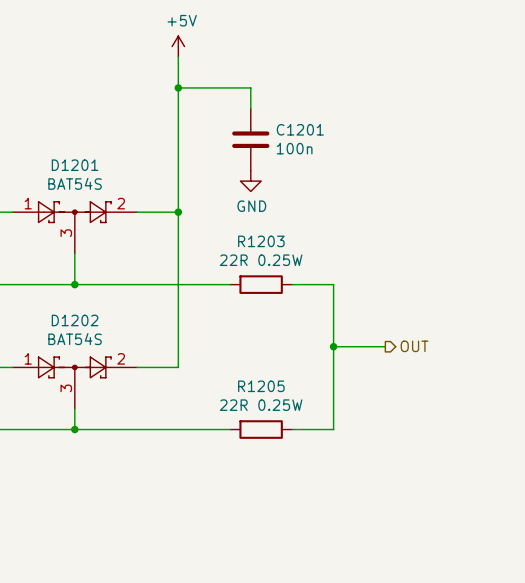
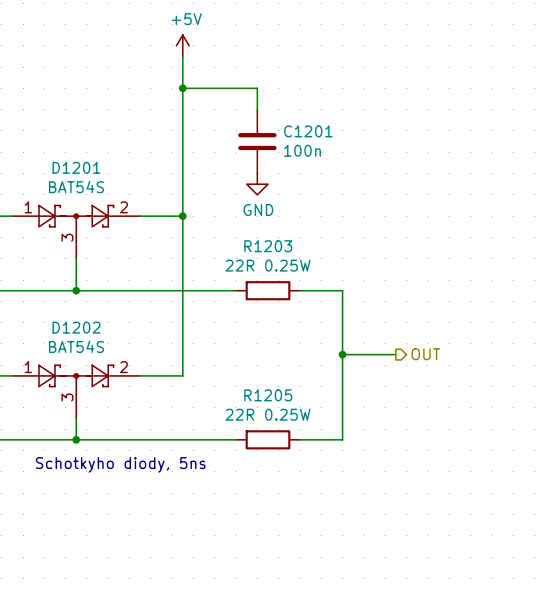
text: none -> Schotkyho diody, 5ns (120, 464)

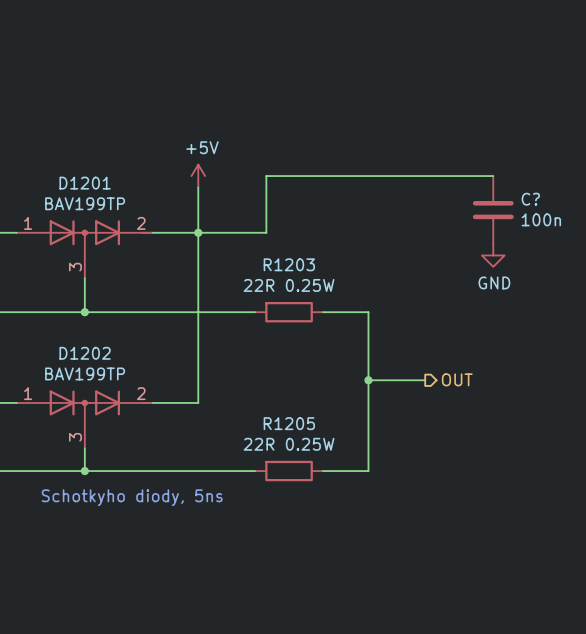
power symbol position: +5V (182, 45) -> +5V (198, 176)
wire: (182, 56) (182, 173) -> none
wire: (182, 88) (257, 88) (257, 109) -> none
junction: (182, 88) -> none
C1201: 100n (257, 141) -> none
wire: none -> (493, 176) (266, 176) (266, 232) (198, 232)
power symbol position: GND (257, 184) -> GND (493, 255)
D1201 value: BAT54S (76, 186) -> BAV199TP (85, 203)
C?: none -> 100n (493, 210)
D1201 symbol: [12, 205, 141, 259] -> [16, 220, 153, 279]
D1202 value: BAT54S (76, 346) -> BAV199TP (85, 373)
D1202 symbol: [12, 365, 141, 419] -> [16, 390, 153, 449]

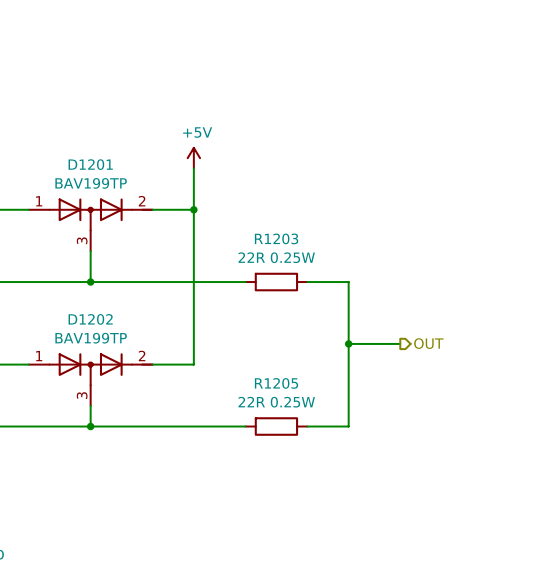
wire: (493, 176) (266, 176) (266, 232) (198, 232) -> none
C?: 100n (493, 210) -> none
power symbol: GND (493, 255) -> none
text: Schotkyho diody, 5ns (132, 497) -> none

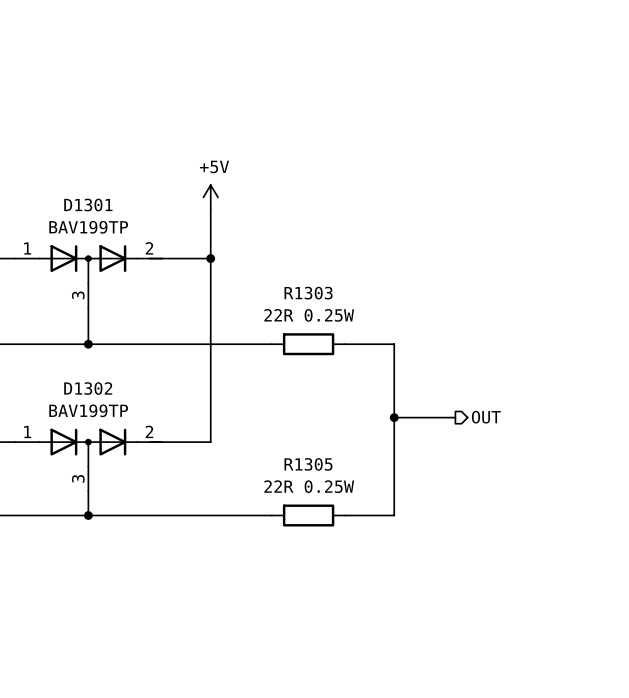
D1201 name: D1201 (90, 164) -> D1301 (88, 205)
R1203 name: R1203 (276, 238) -> R1303 (308, 293)
D1202 name: D1202 (90, 319) -> D1302 (88, 388)
R1205 name: R1205 (276, 383) -> R1305 (308, 464)

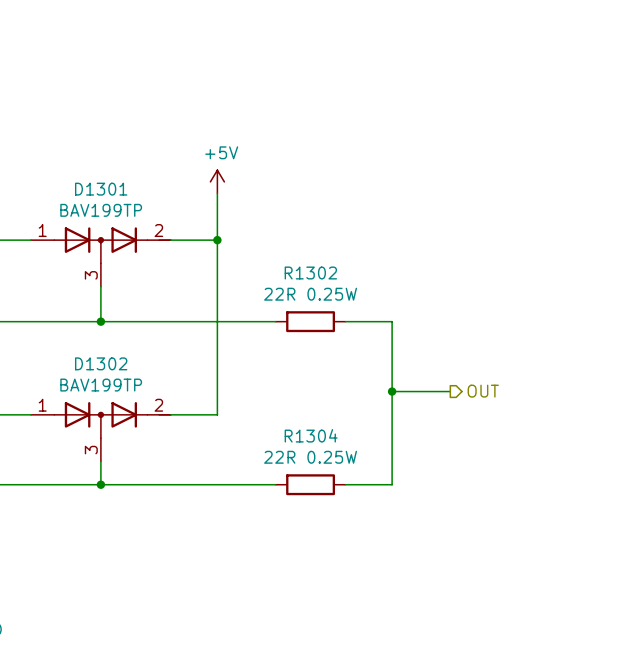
R1303 name: R1303 (308, 293) -> R1302 (310, 273)
R1305 name: R1305 (308, 464) -> R1304 (311, 435)

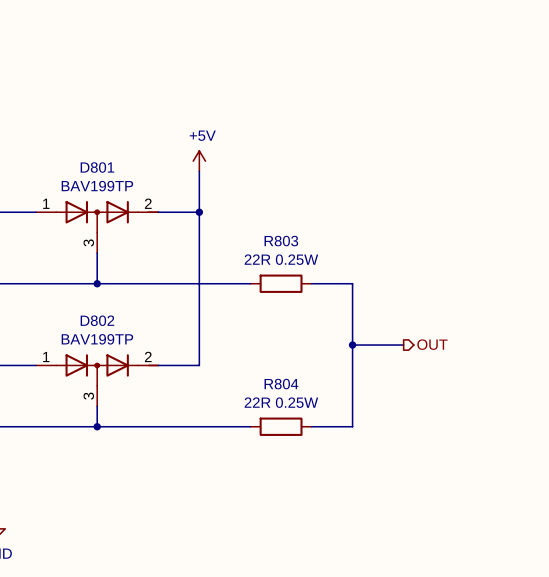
D1301 name: D1301 (101, 189) -> D801 (97, 167)
R1302 name: R1302 (310, 273) -> R803 (281, 241)
D1302 name: D1302 (101, 363) -> D802 (97, 320)
R1304 name: R1304 (311, 435) -> R804 (281, 384)

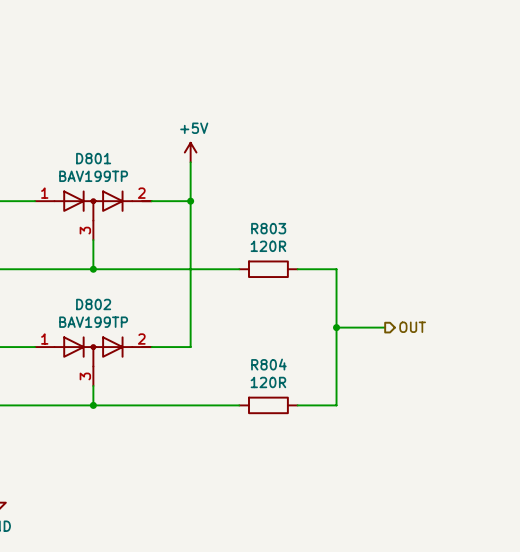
R803 value: 22R 0.25W (281, 259) -> 120R (268, 246)
R804 value: 22R 0.25W (281, 402) -> 120R (268, 382)

